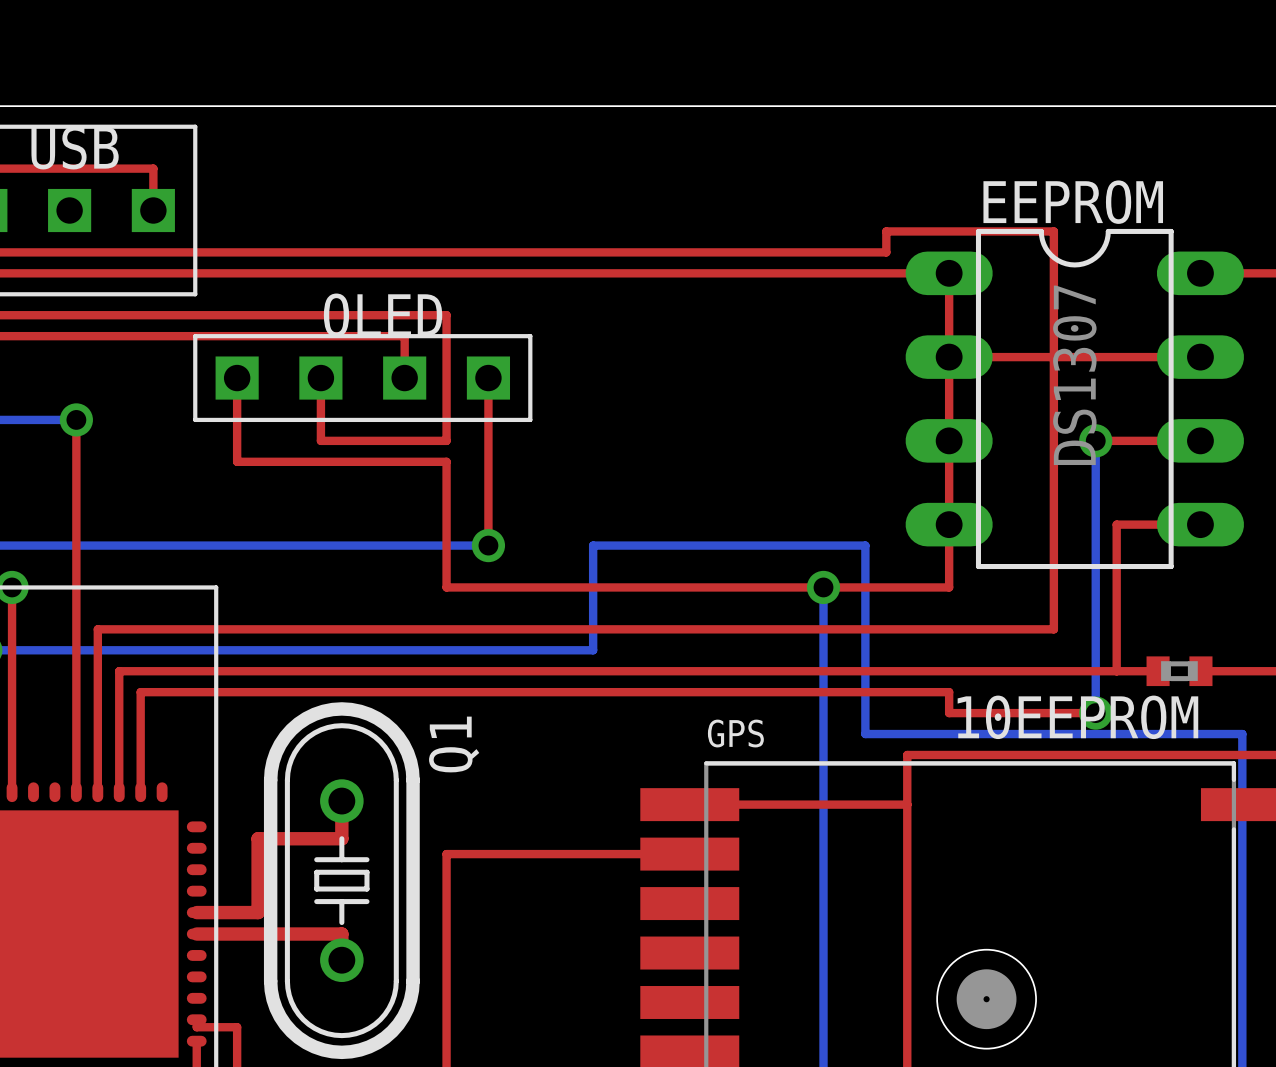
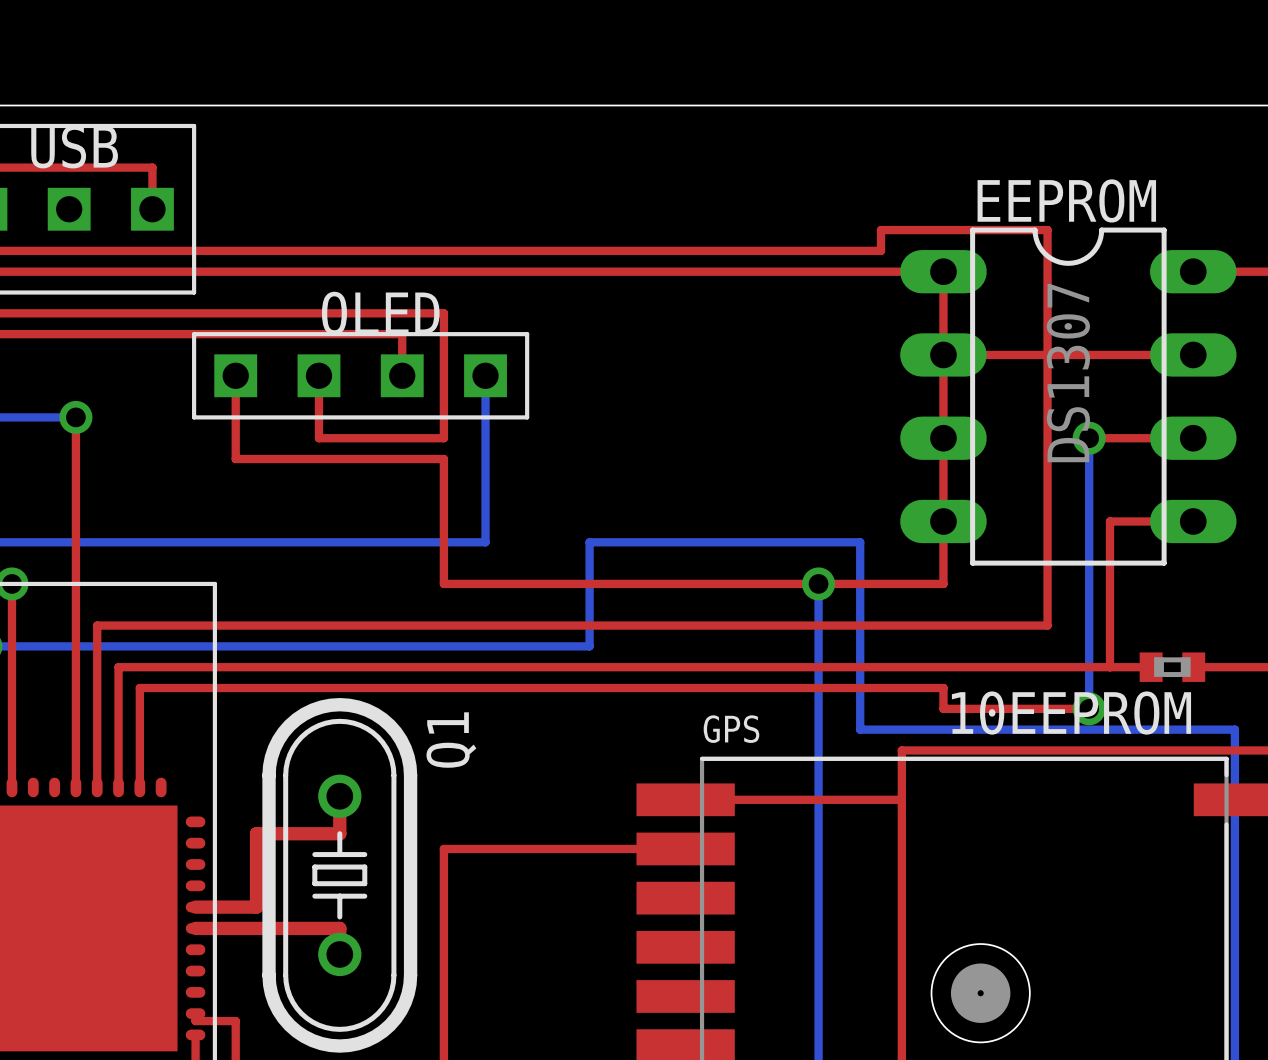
top track: (488, 378) (488, 545) -> none
bottom track: none -> (485, 375) (485, 542)
via: (488, 545) -> none

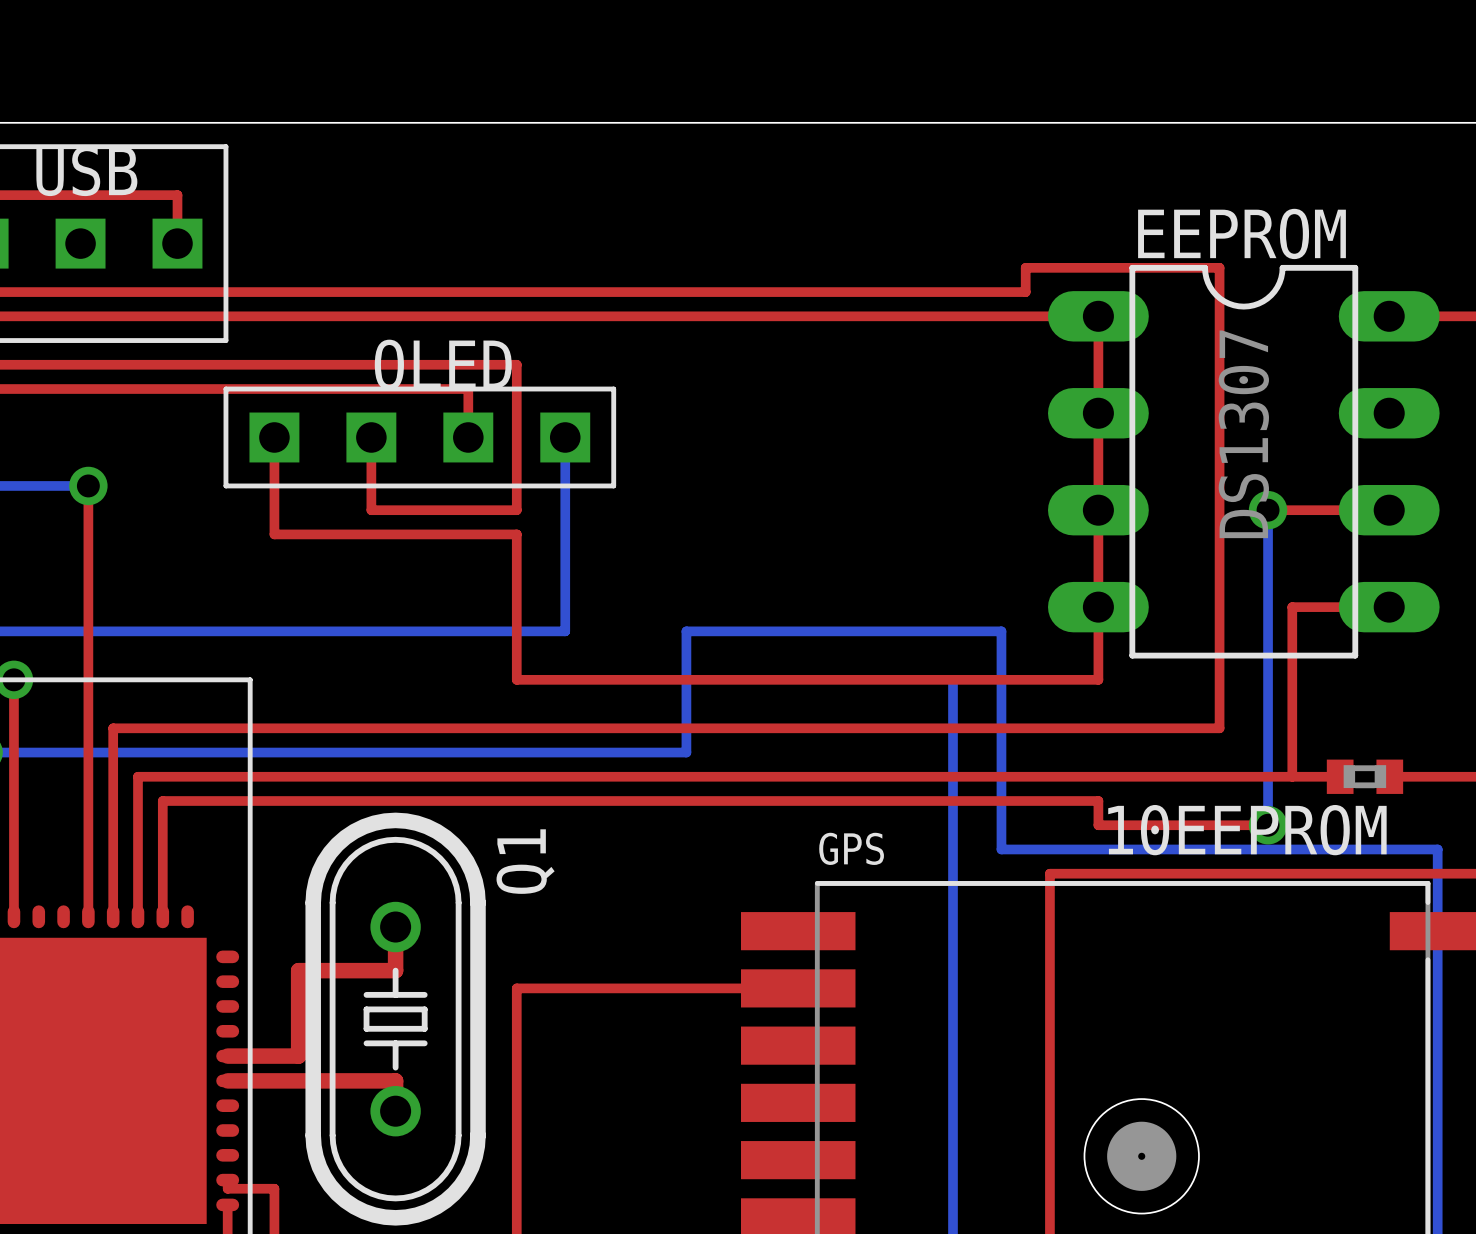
top track: (943, 354) (1193, 354) -> none
via: (818, 583) -> none
top track: (685, 799) (901, 799) -> none

